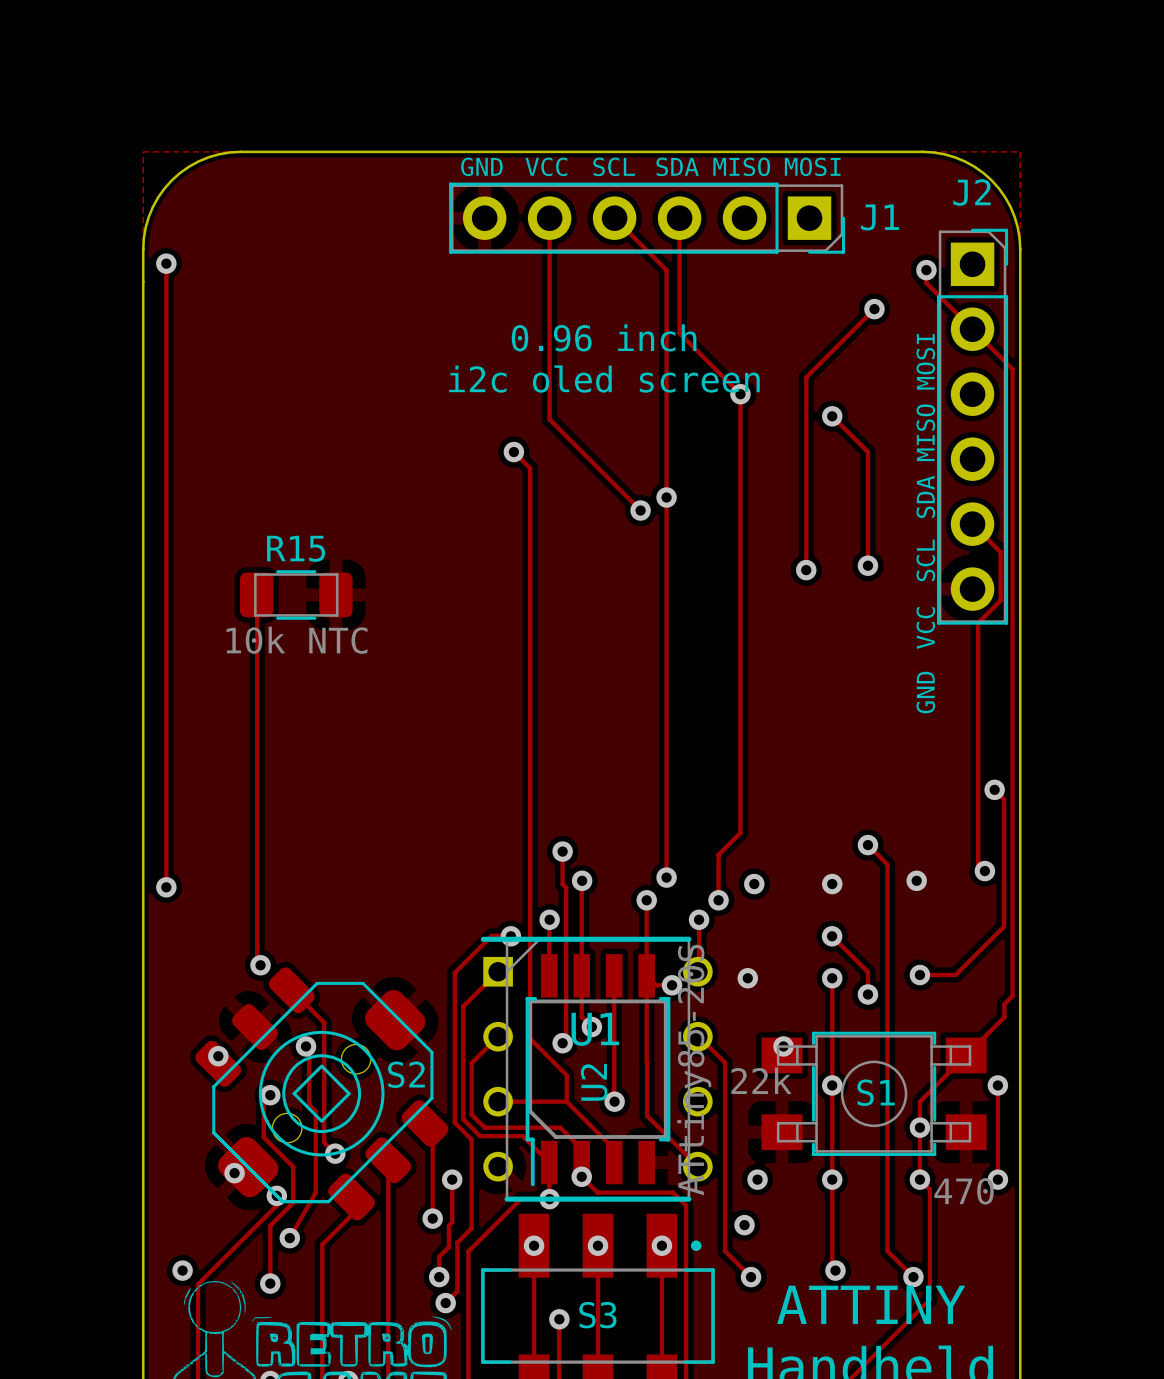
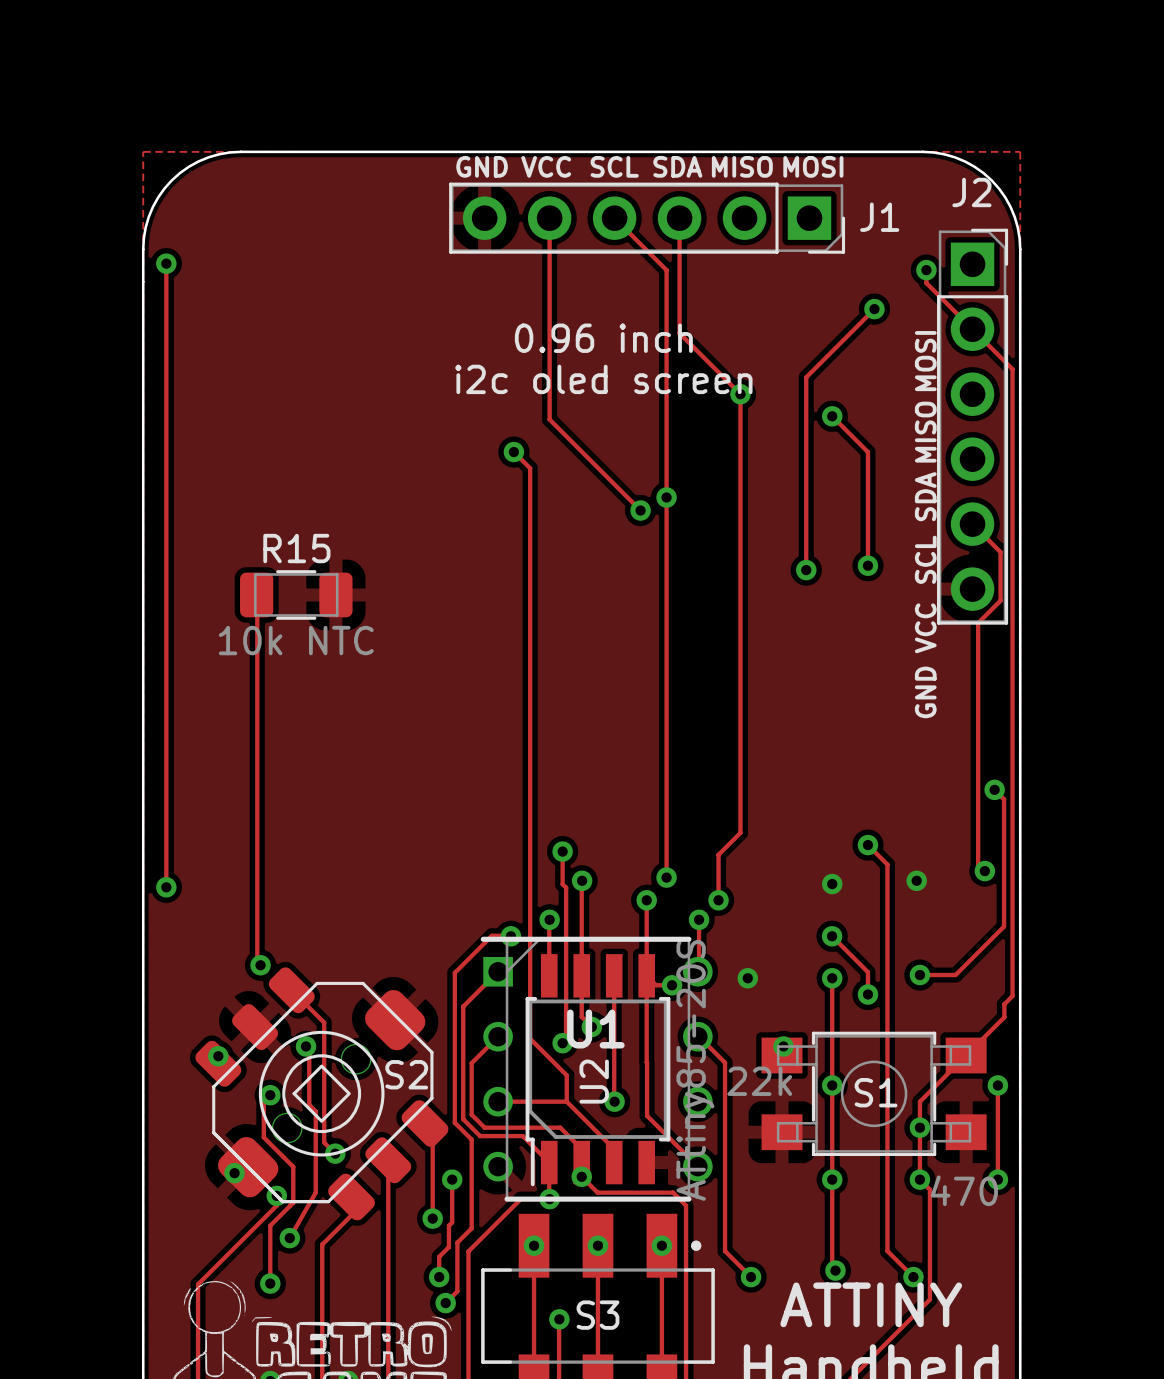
via: (754, 884) -> none
via: (757, 1179) -> none
via: (744, 1225) -> none
via: (182, 1270) -> none

